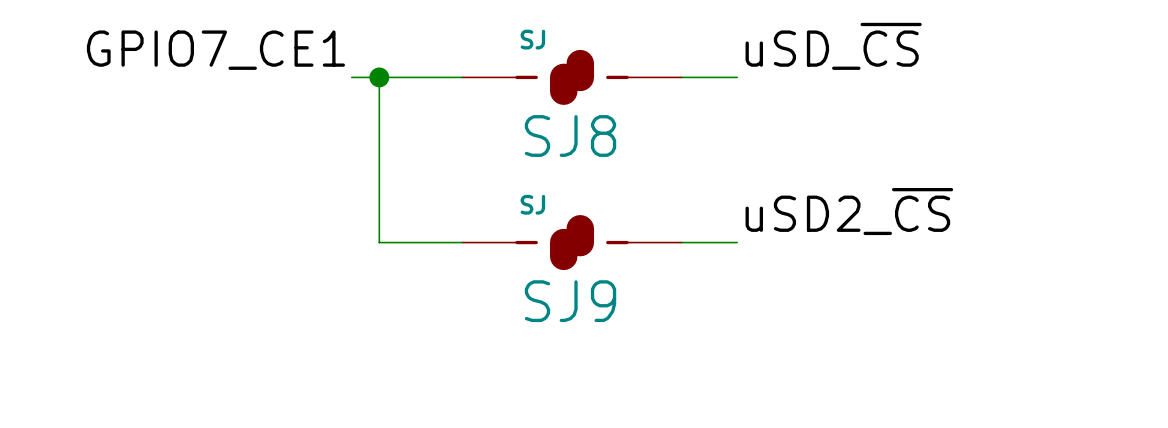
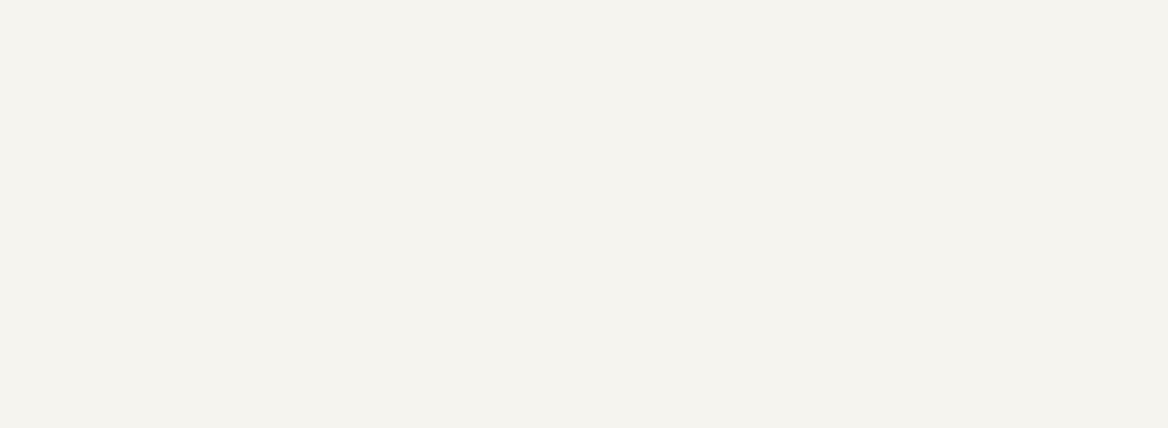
label: uSD_~{CS} (833, 46) -> none
label: GPIO7_CE1 (215, 50) -> none
wire: (351, 77) (461, 77) -> none
wire: (379, 77) (379, 242) (461, 242) -> none
junction: (379, 77) -> none
SJ8: SJ (572, 77) -> none
wire: (682, 77) (737, 77) -> none
label: uSD2_~{CS} (849, 211) -> none
SJ9: SJ (572, 242) -> none
wire: (682, 242) (737, 242) -> none

